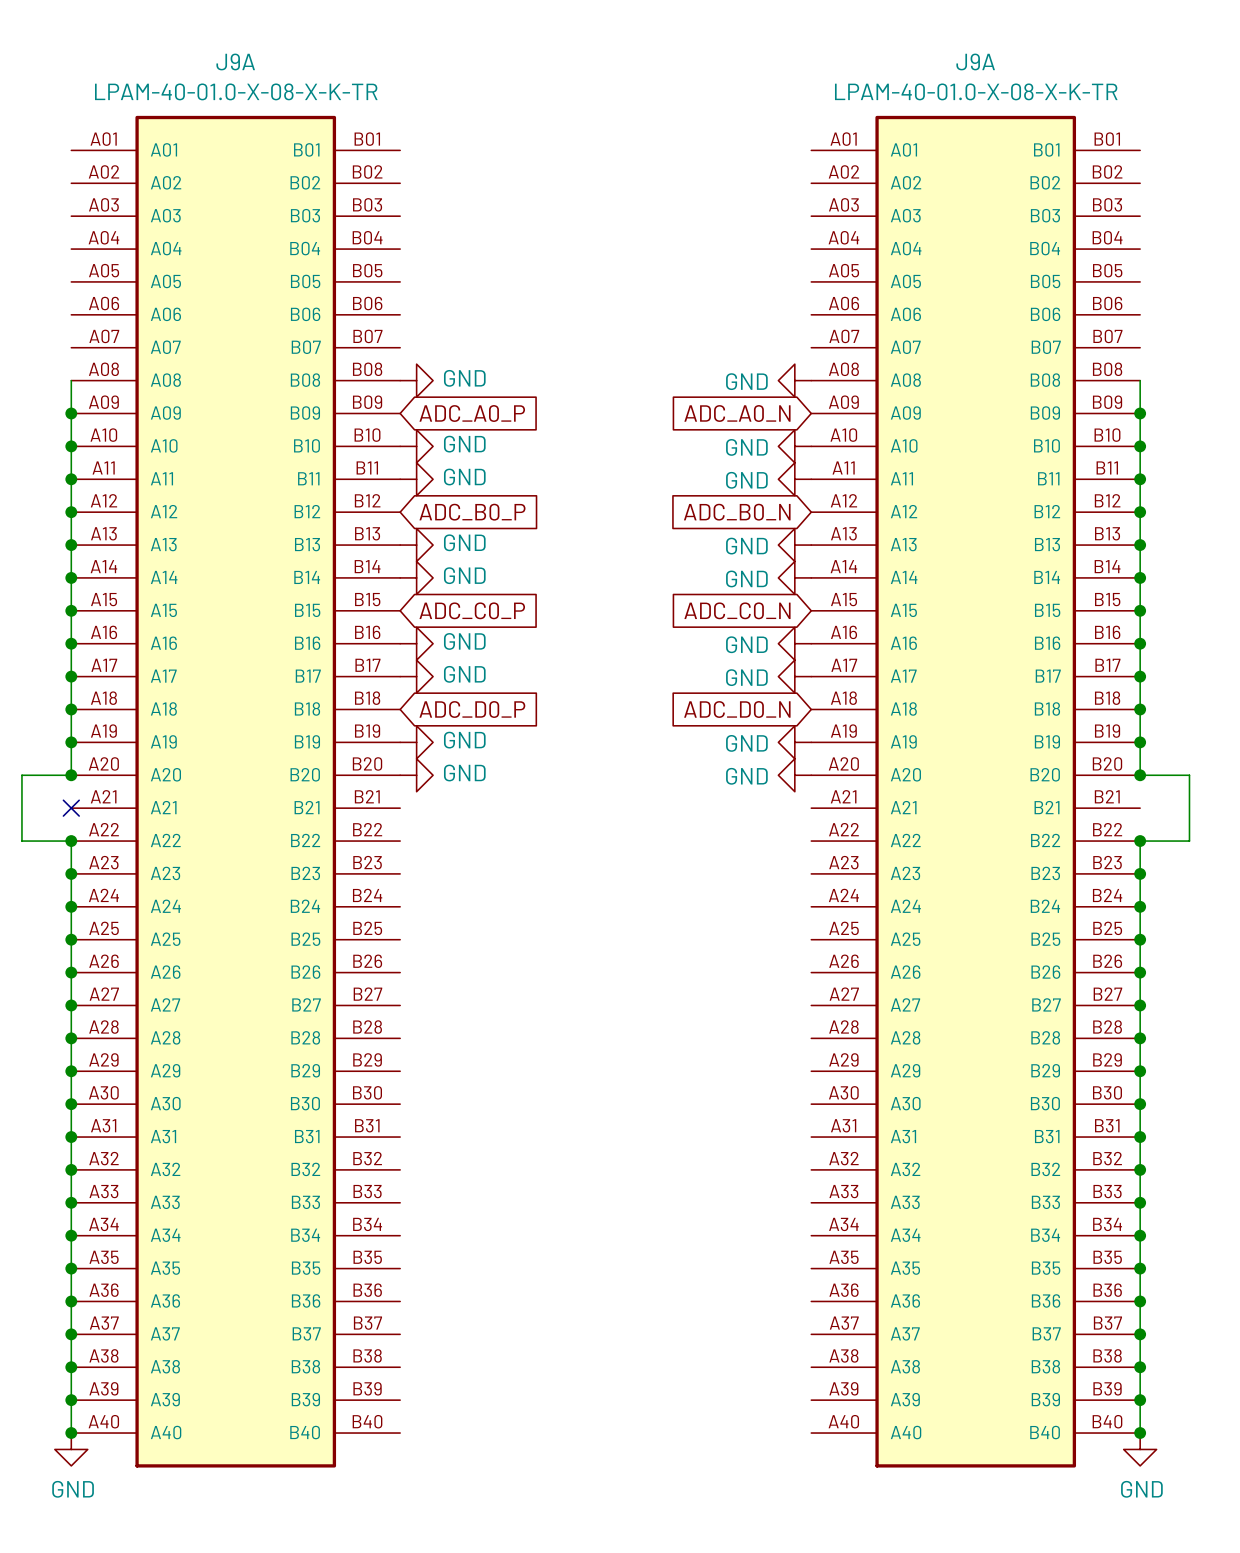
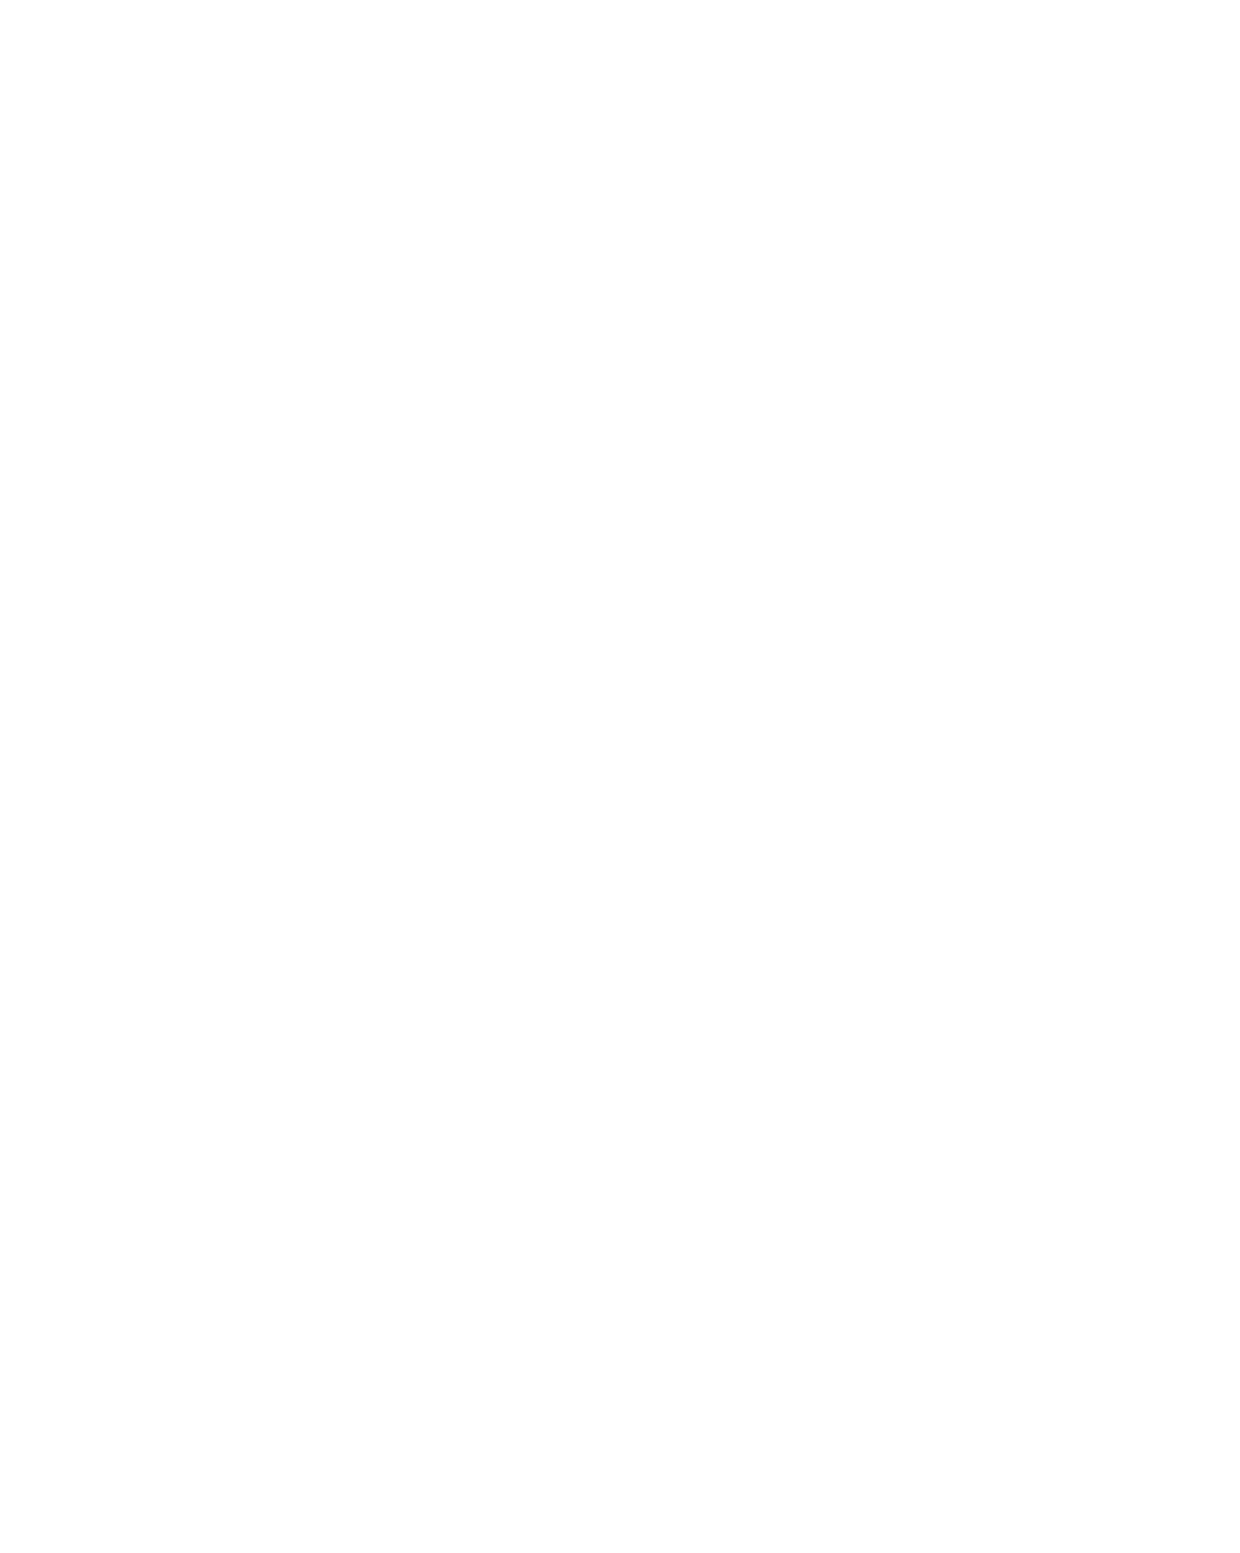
wire: (71, 380) (71, 775) (21, 775) (21, 841) (71, 841) (71, 1433) -> none
power symbol: GND (416, 380) -> none
power symbol: GND (794, 380) -> none
wire: (1140, 380) (1140, 775) (1189, 775) (1189, 841) (1140, 841) (1140, 1433) -> none
junction: (71, 413) -> none
global label: ADC_A0_P (472, 413) -> none
global label: ADC_A0_N (737, 413) -> none
junction: (1140, 413) -> none
junction: (71, 446) -> none
power symbol: GND (416, 446) -> none
power symbol: GND (794, 446) -> none
junction: (1140, 446) -> none
junction: (71, 479) -> none
power symbol: GND (416, 479) -> none
power symbol: GND (794, 479) -> none
junction: (1140, 479) -> none
junction: (71, 512) -> none
global label: ADC_B0_P (472, 512) -> none
global label: ADC_B0_N (737, 512) -> none
junction: (1140, 512) -> none
junction: (71, 545) -> none
power symbol: GND (416, 545) -> none
power symbol: GND (794, 545) -> none
junction: (1140, 545) -> none
junction: (71, 577) -> none
power symbol: GND (416, 577) -> none
power symbol: GND (794, 577) -> none
junction: (1140, 577) -> none
junction: (71, 610) -> none
global label: ADC_C0_P (472, 610) -> none
global label: ADC_C0_N (737, 610) -> none
junction: (1140, 610) -> none
junction: (71, 643) -> none
power symbol: GND (416, 643) -> none
power symbol: GND (794, 643) -> none
junction: (1140, 643) -> none
junction: (71, 676) -> none
power symbol: GND (416, 676) -> none
power symbol: GND (794, 676) -> none
junction: (1140, 676) -> none
junction: (71, 709) -> none
global label: ADC_D0_P (472, 709) -> none
global label: ADC_D0_N (737, 709) -> none
junction: (1140, 709) -> none
junction: (71, 742) -> none
power symbol: GND (416, 742) -> none
power symbol: GND (794, 742) -> none
junction: (1140, 742) -> none
junction: (71, 775) -> none
power symbol: GND (416, 775) -> none
power symbol: GND (794, 775) -> none
junction: (1140, 775) -> none
J9A: LPAM-40-01.0-X-08-X-K-TR (235, 791) -> none
J9A: LPAM-40-01.0-X-08-X-K-TR (975, 791) -> none
no-connect mark: (71, 808) -> none
junction: (71, 841) -> none
junction: (1140, 841) -> none
junction: (71, 873) -> none
junction: (1140, 873) -> none
junction: (71, 906) -> none
junction: (1140, 906) -> none
junction: (71, 939) -> none
junction: (1140, 939) -> none
junction: (71, 972) -> none
junction: (1140, 972) -> none
junction: (71, 1005) -> none
junction: (1140, 1005) -> none
junction: (71, 1038) -> none
junction: (1140, 1038) -> none
junction: (71, 1071) -> none
junction: (1140, 1071) -> none
junction: (71, 1104) -> none
junction: (1140, 1104) -> none
junction: (71, 1137) -> none
junction: (1140, 1137) -> none
junction: (71, 1169) -> none
junction: (1140, 1169) -> none
junction: (71, 1202) -> none
junction: (1140, 1202) -> none
junction: (71, 1235) -> none
junction: (1140, 1235) -> none
junction: (71, 1268) -> none
junction: (1140, 1268) -> none
junction: (71, 1301) -> none
junction: (1140, 1301) -> none
junction: (71, 1334) -> none
junction: (1140, 1334) -> none
junction: (71, 1367) -> none
junction: (1140, 1367) -> none
junction: (71, 1400) -> none
junction: (1140, 1400) -> none
junction: (71, 1433) -> none
junction: (1140, 1433) -> none
power symbol: GND (71, 1449) -> none
power symbol: GND (1140, 1449) -> none

